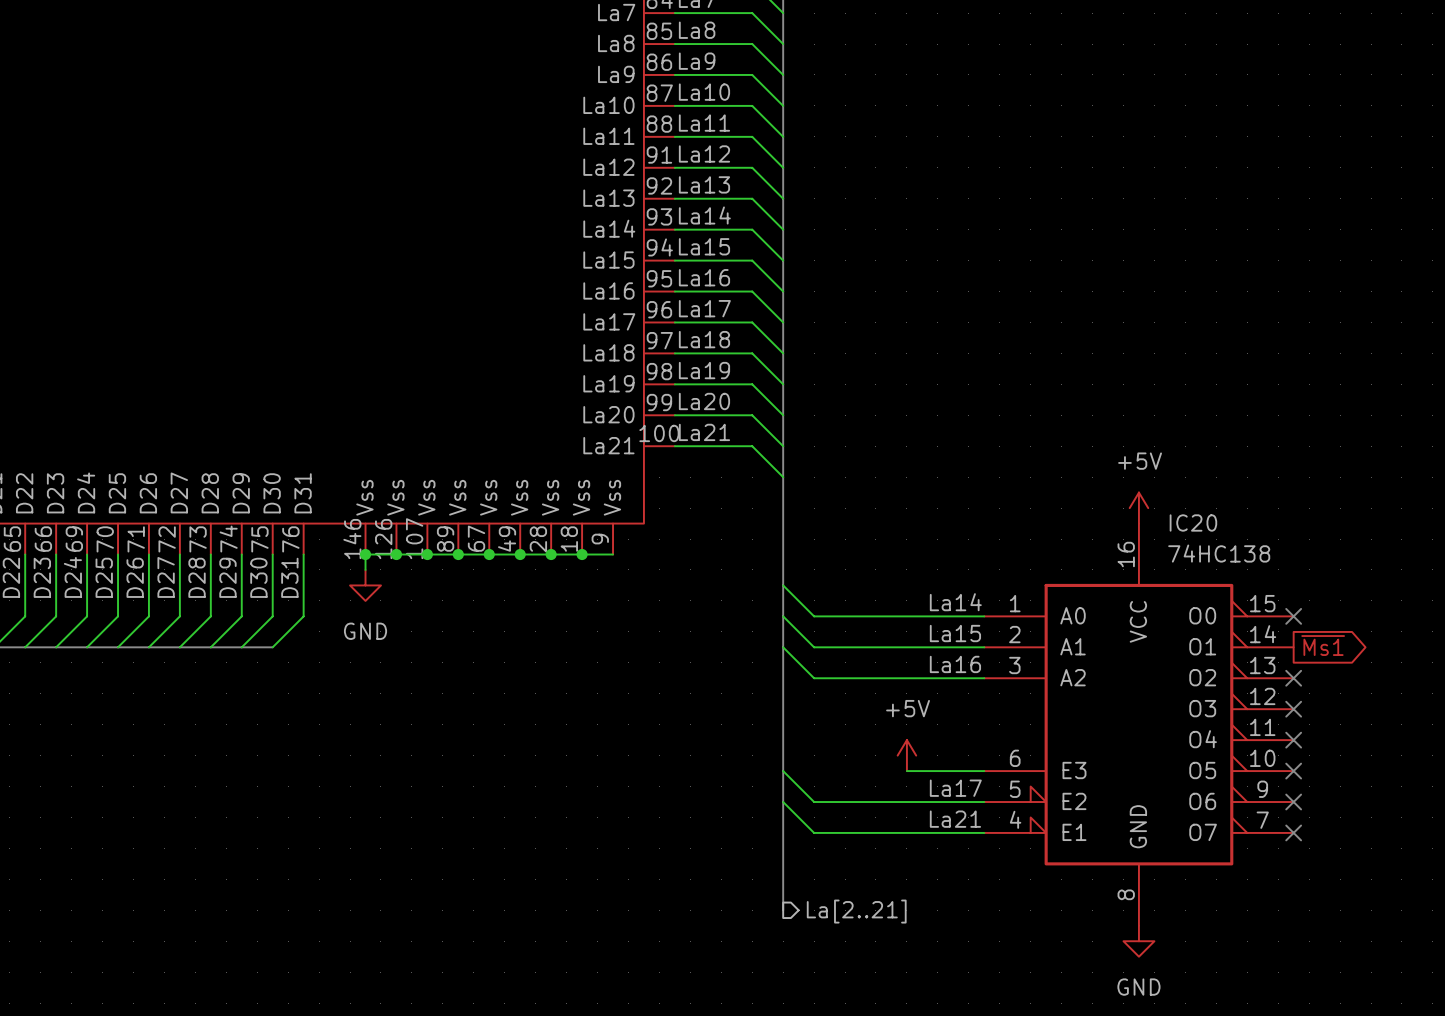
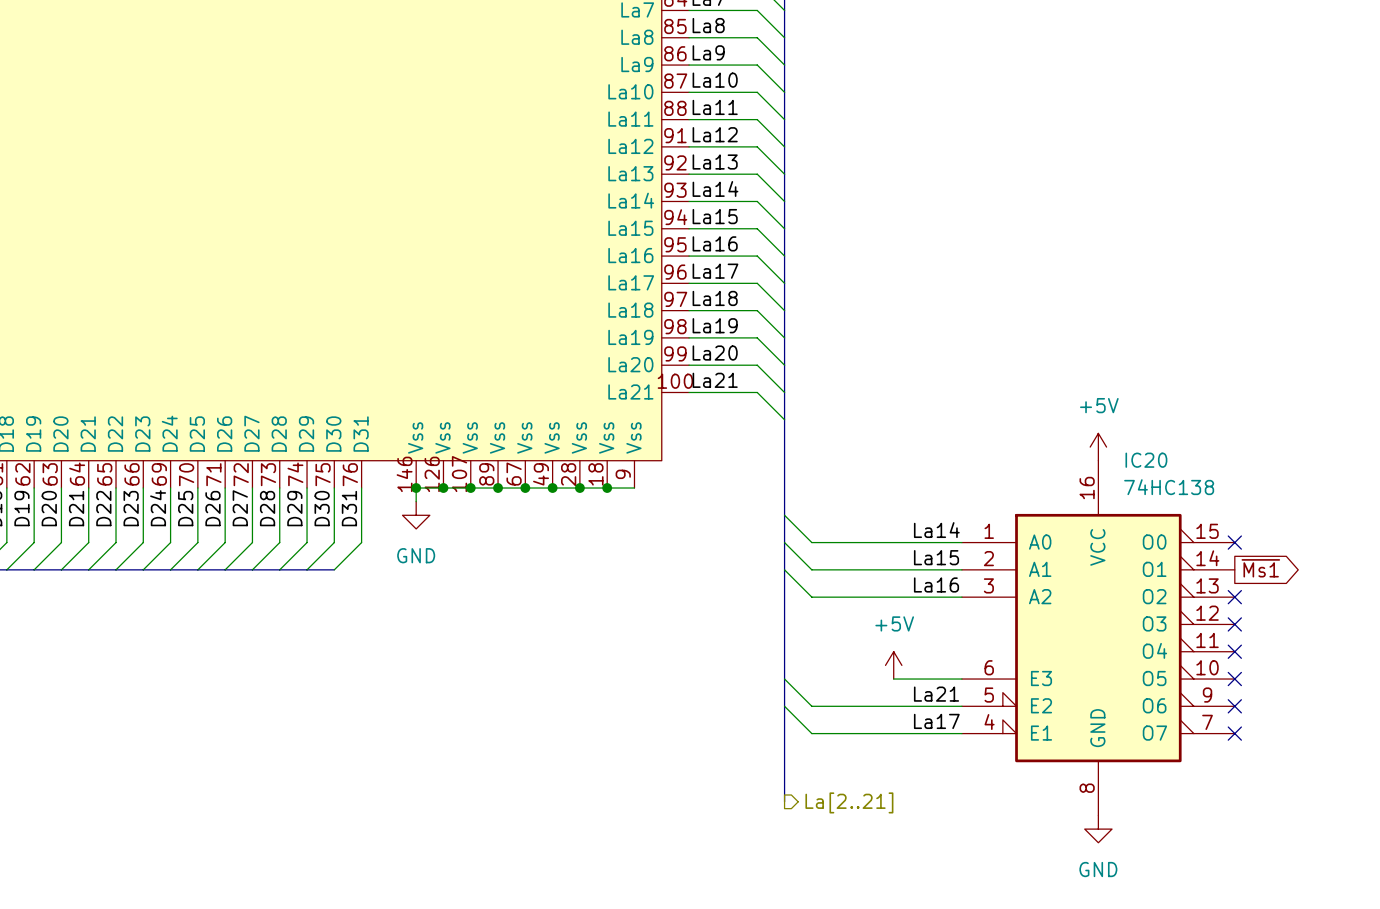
label: La17 (955, 788) -> La21 (936, 694)
label: La21 (955, 819) -> La17 (936, 721)

